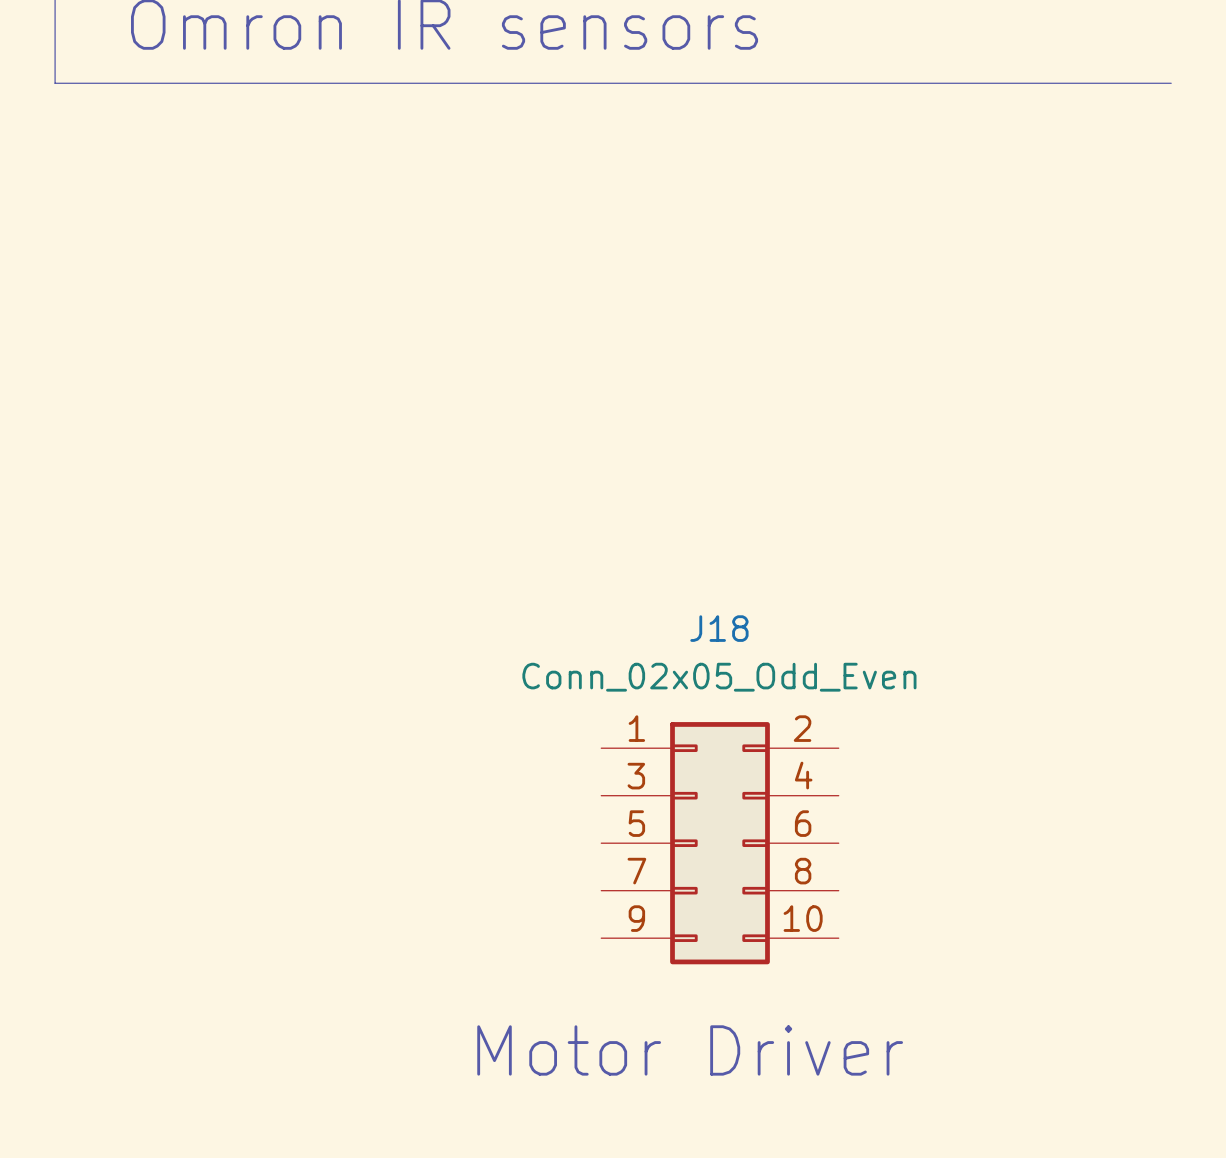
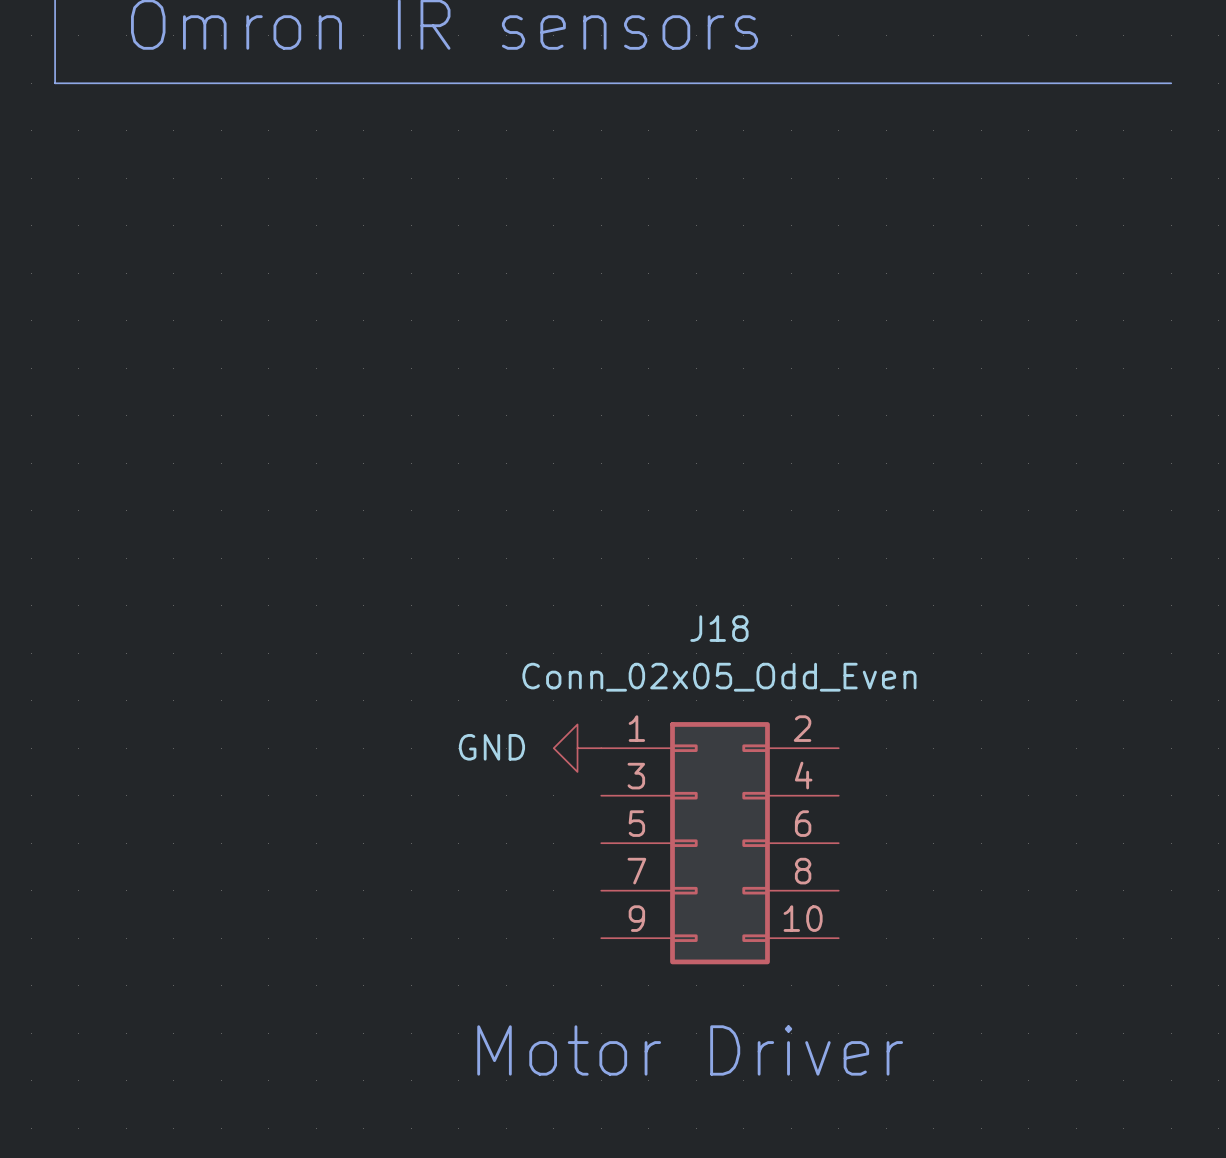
power symbol: none -> GND (577, 748)

